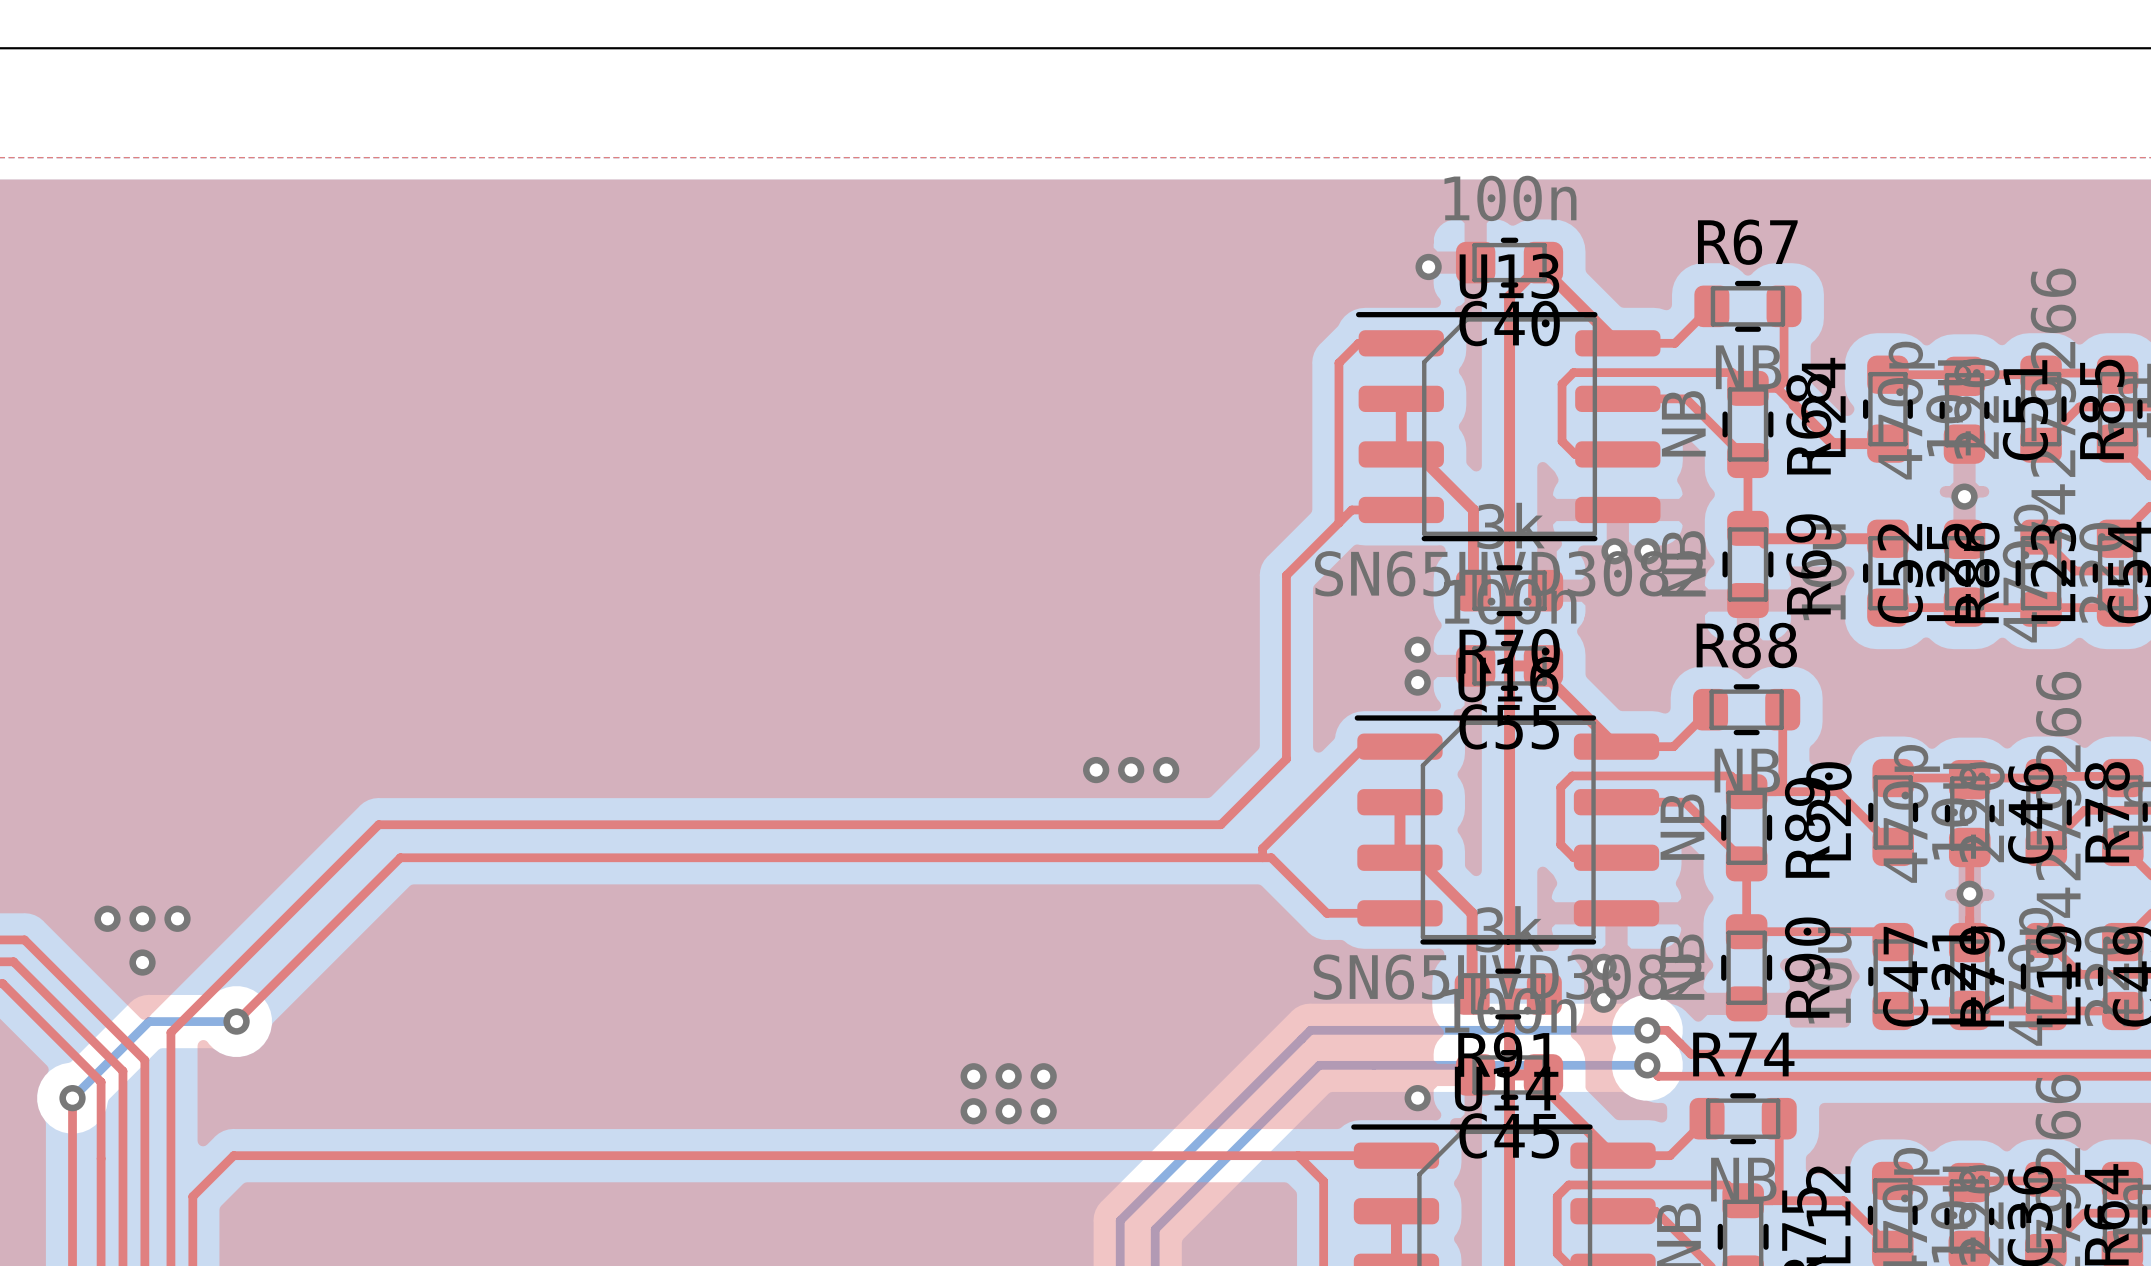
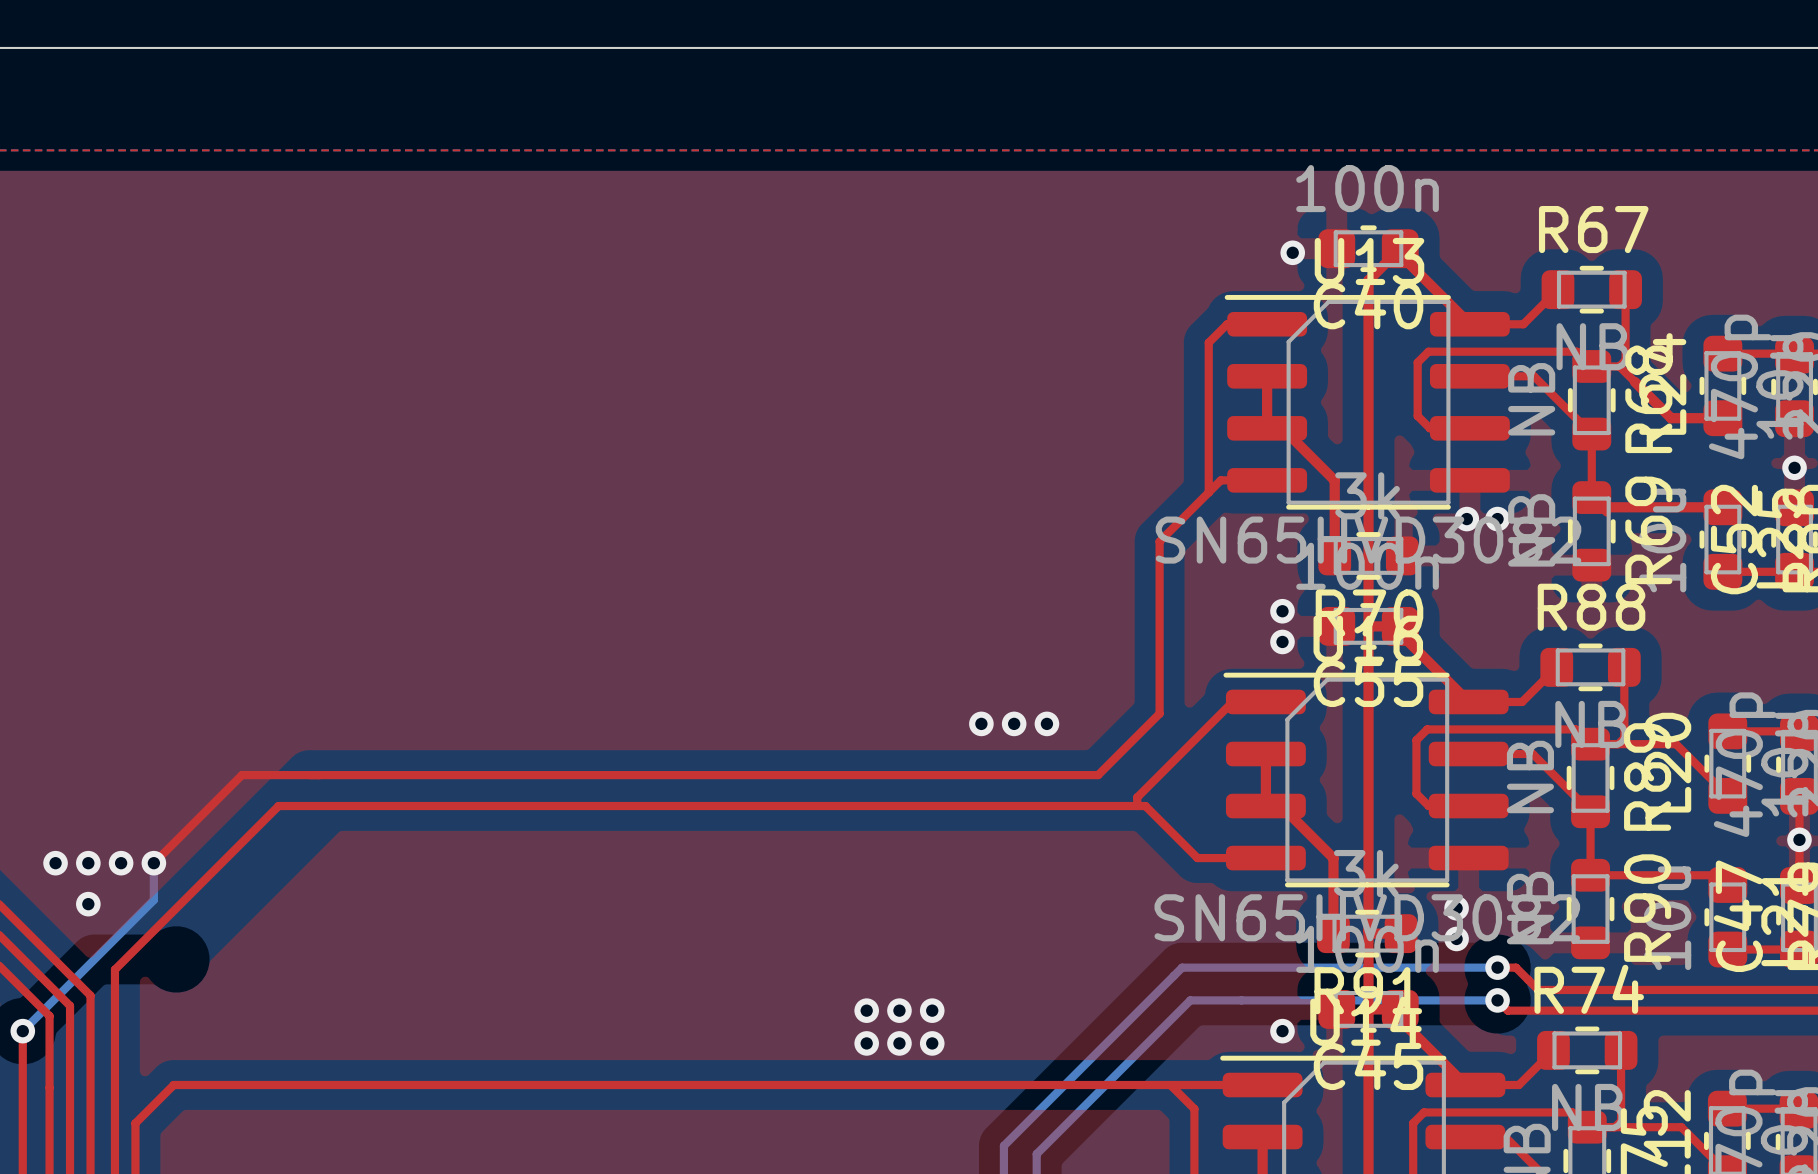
top track: (378, 824) (345, 857) -> (329, 806) (278, 806)
top track: none -> (309, 775) (241, 775) (153, 863)
top track: (400, 857) (236, 1021) -> none
bottom track: (149, 1021) (236, 1021) -> (94, 959) (153, 900) (153, 863)
via position: (236, 1021) -> (153, 863)

